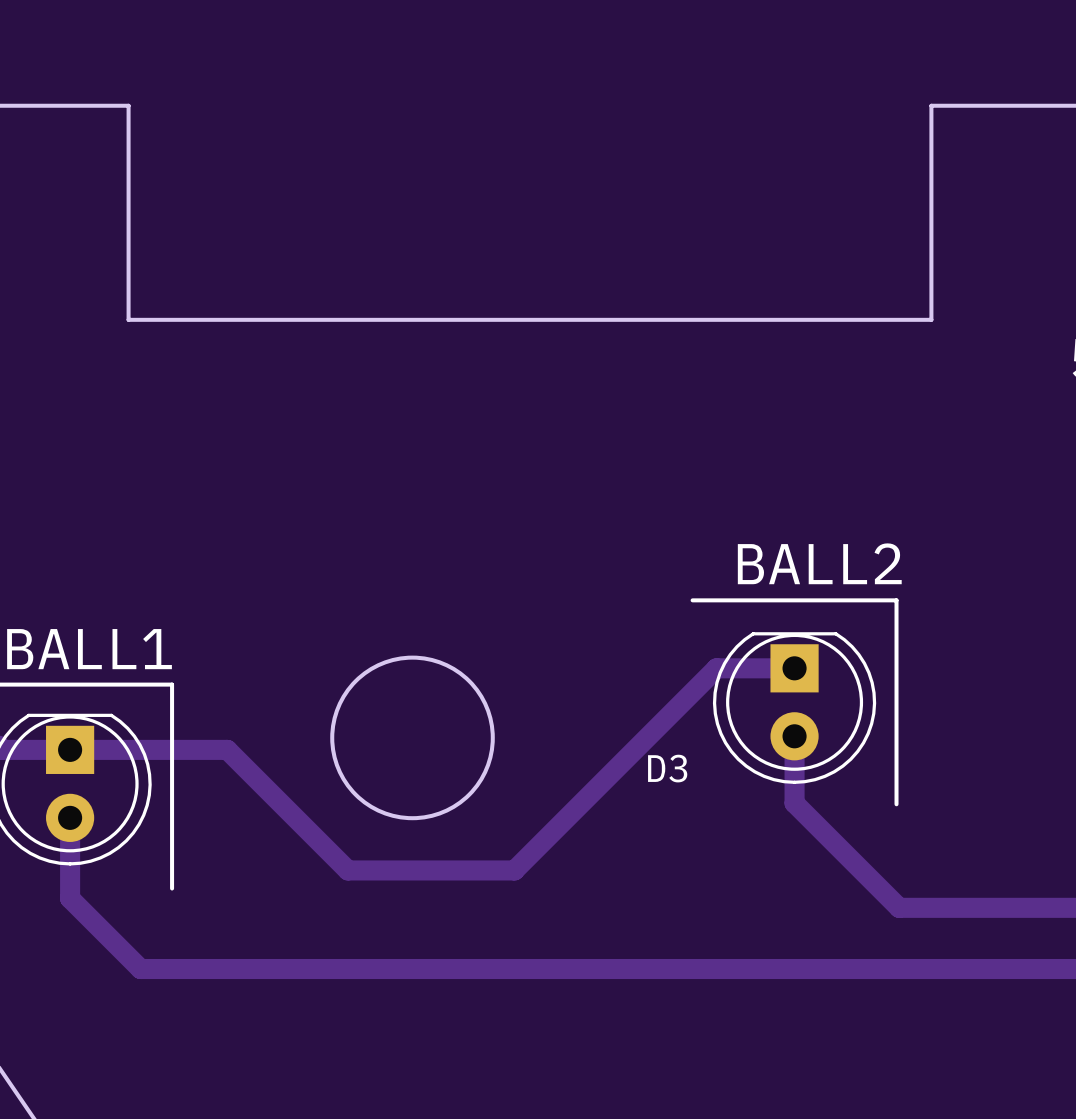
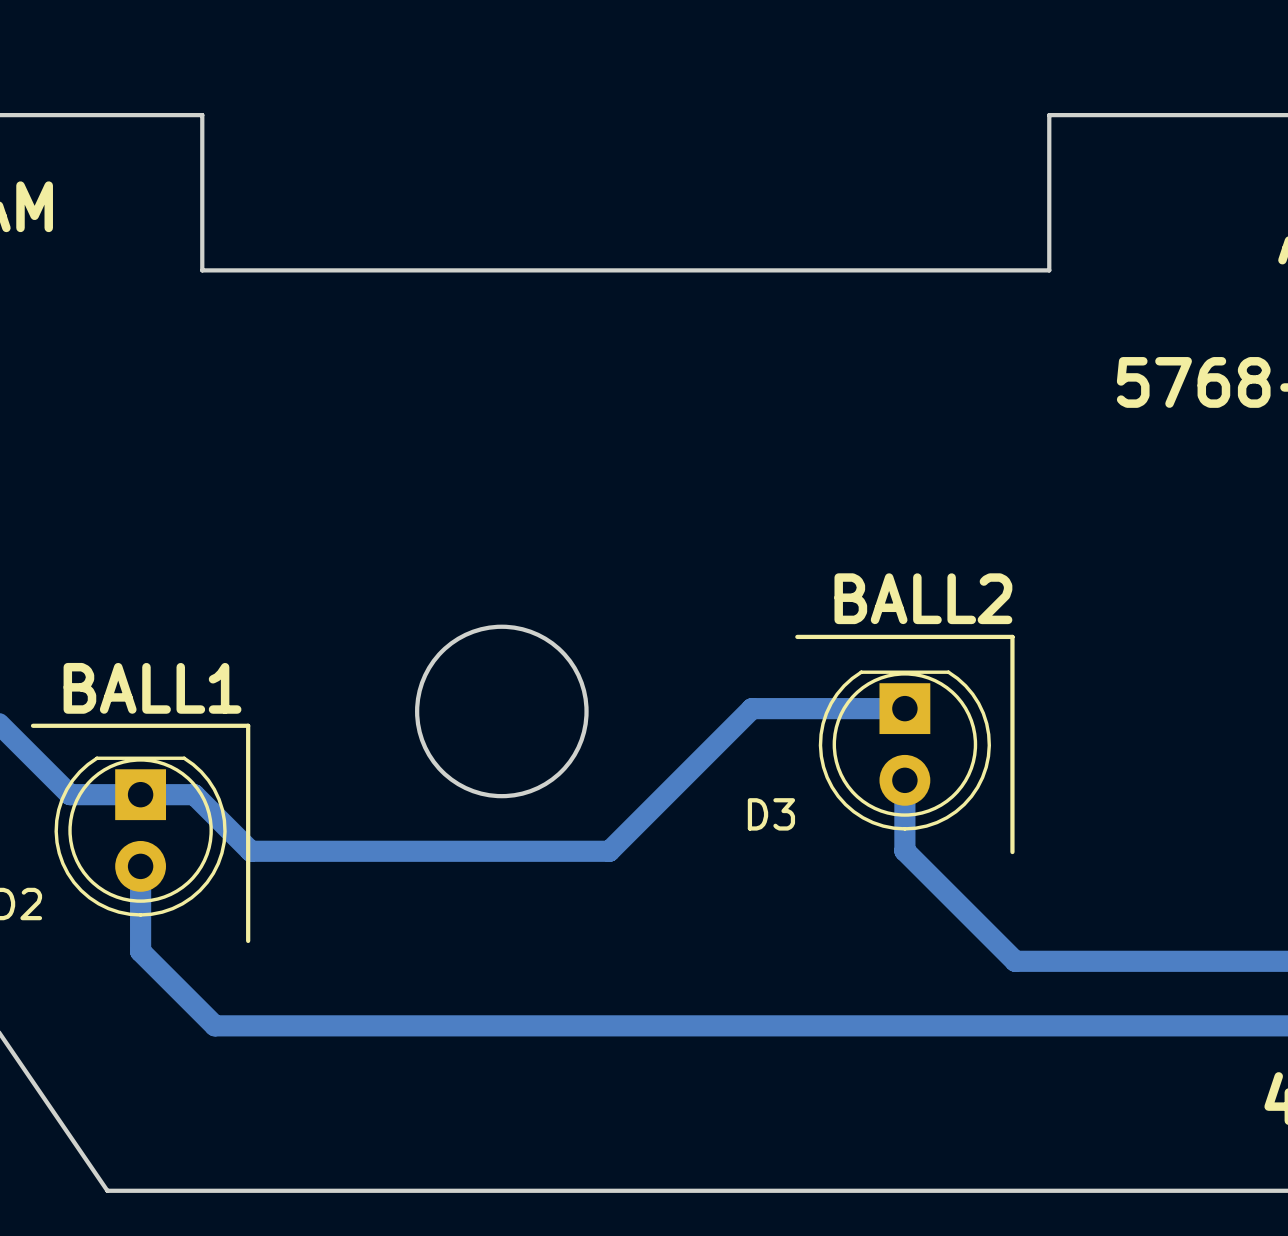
board edge: (931, 252) (931, 319) (128, 319) (128, 252) -> (1049, 270) (202, 270)
track: (716, 668) (514, 870) (347, 870) (227, 749) (120, 749) -> (822, 708) (752, 708) (609, 851) (250, 851) (194, 794)
round board edge position: (412, 737) -> (501, 711)

